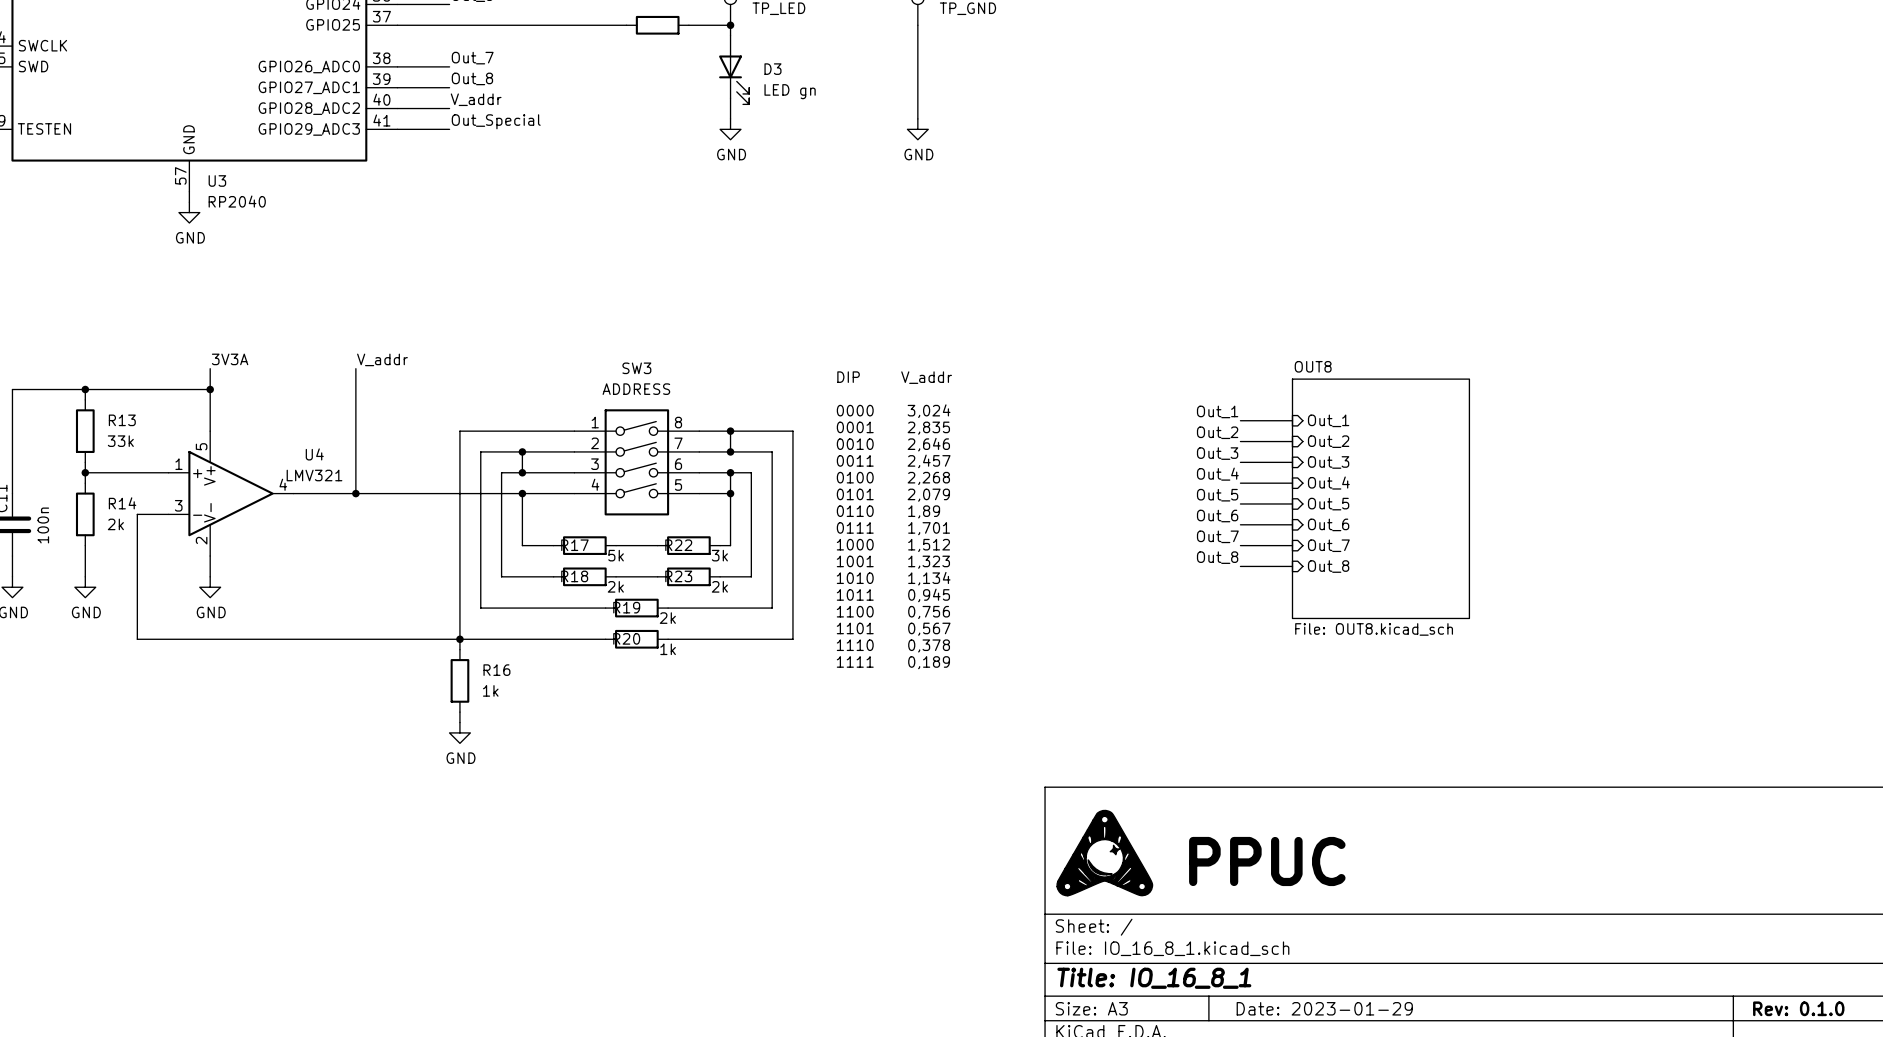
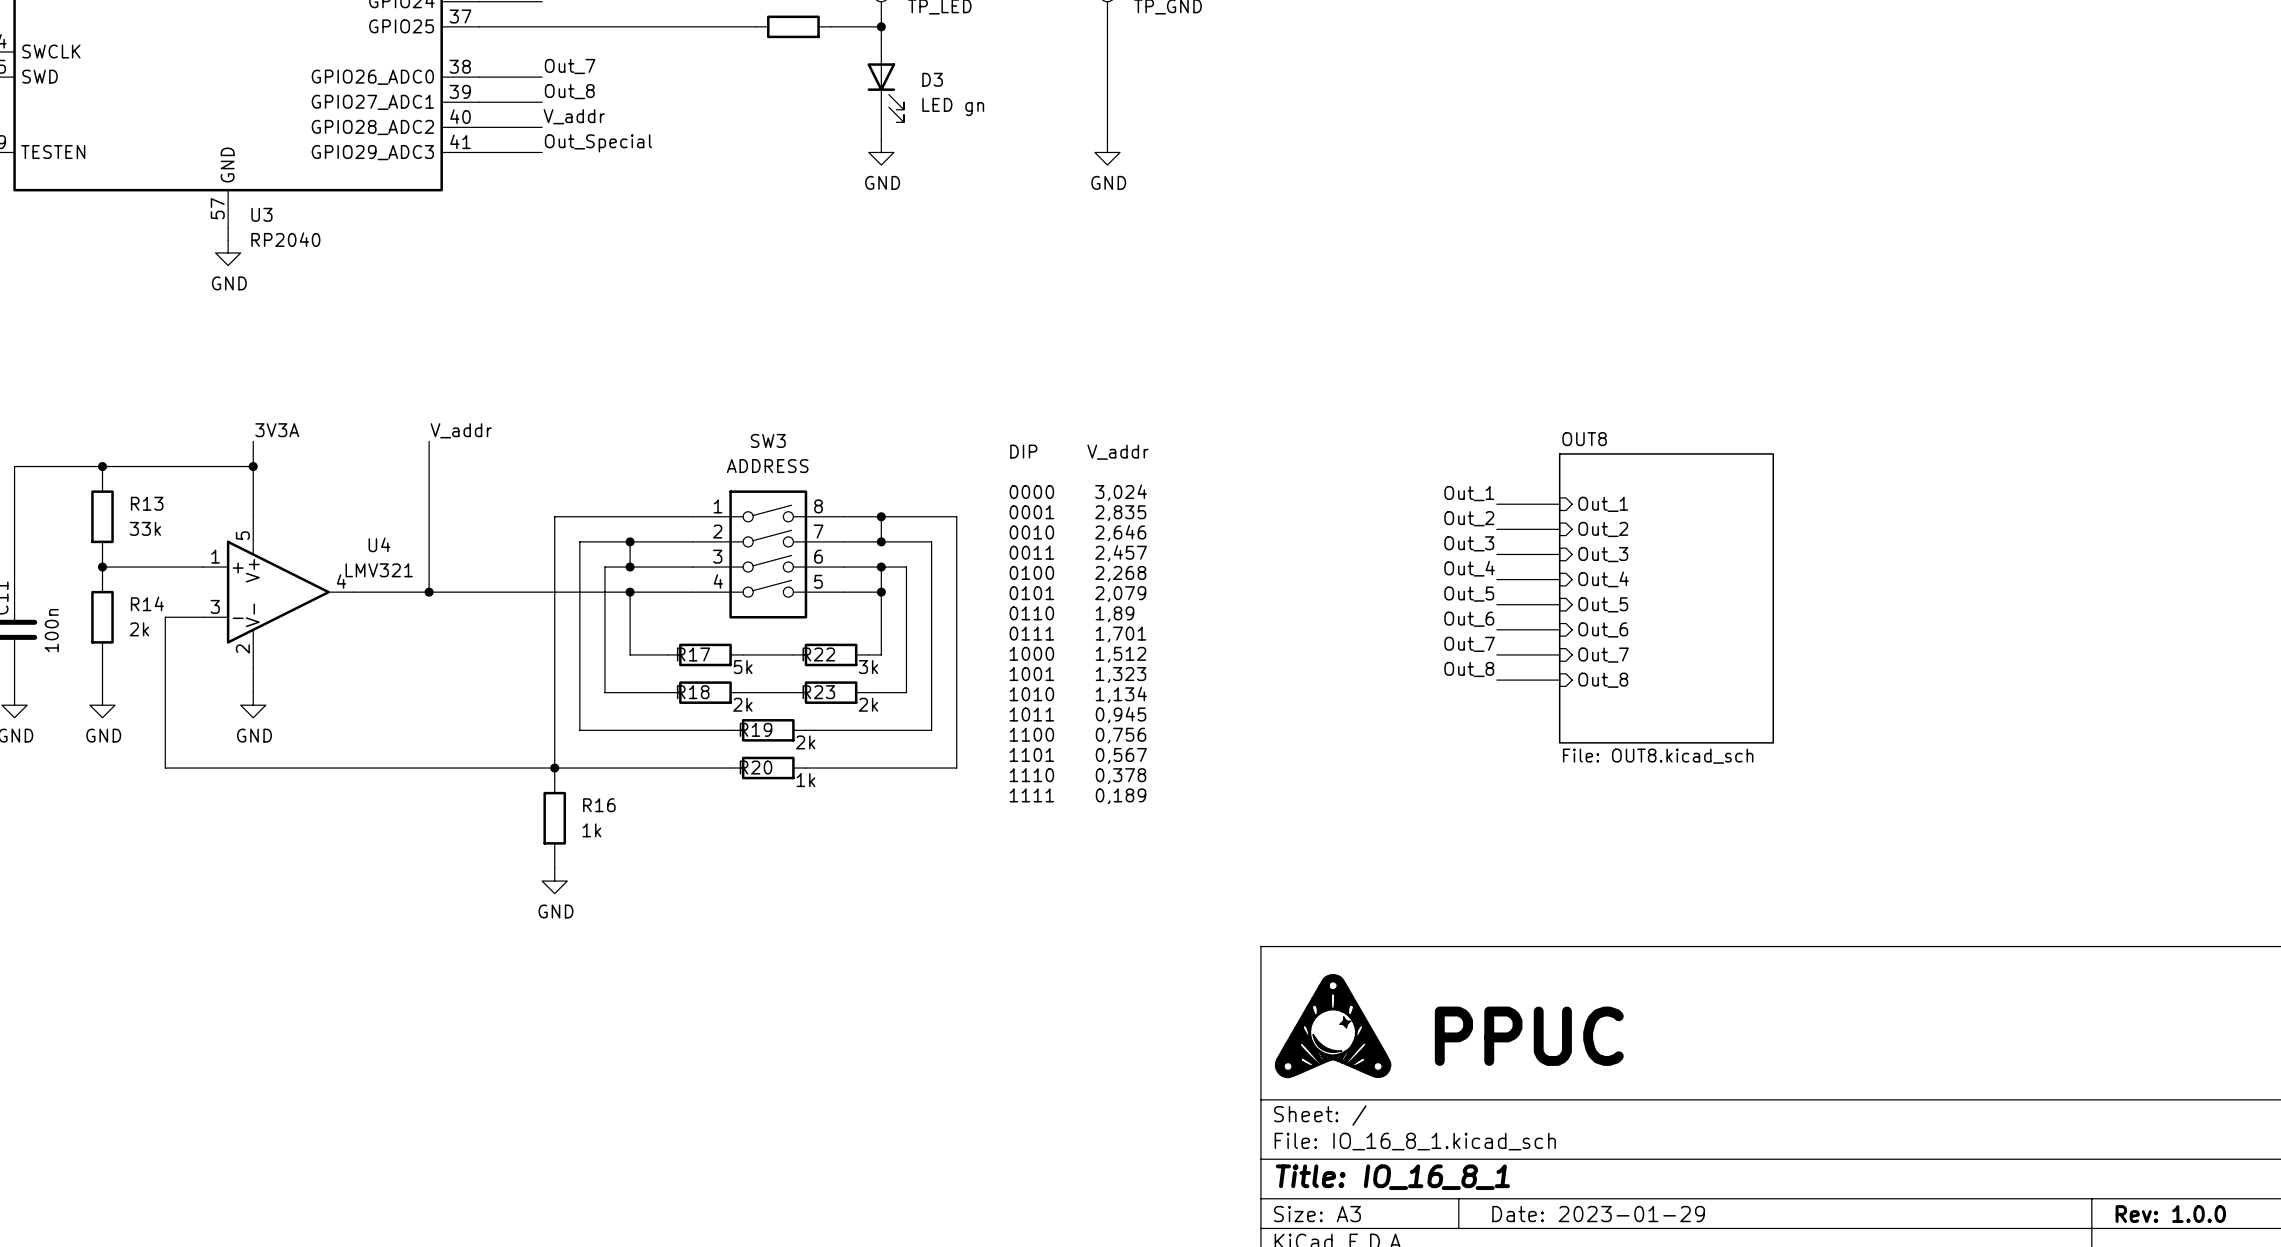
title block: Rev: 0.1.0 (1798, 1008) -> Rev: 1.0.0 (2170, 1214)

